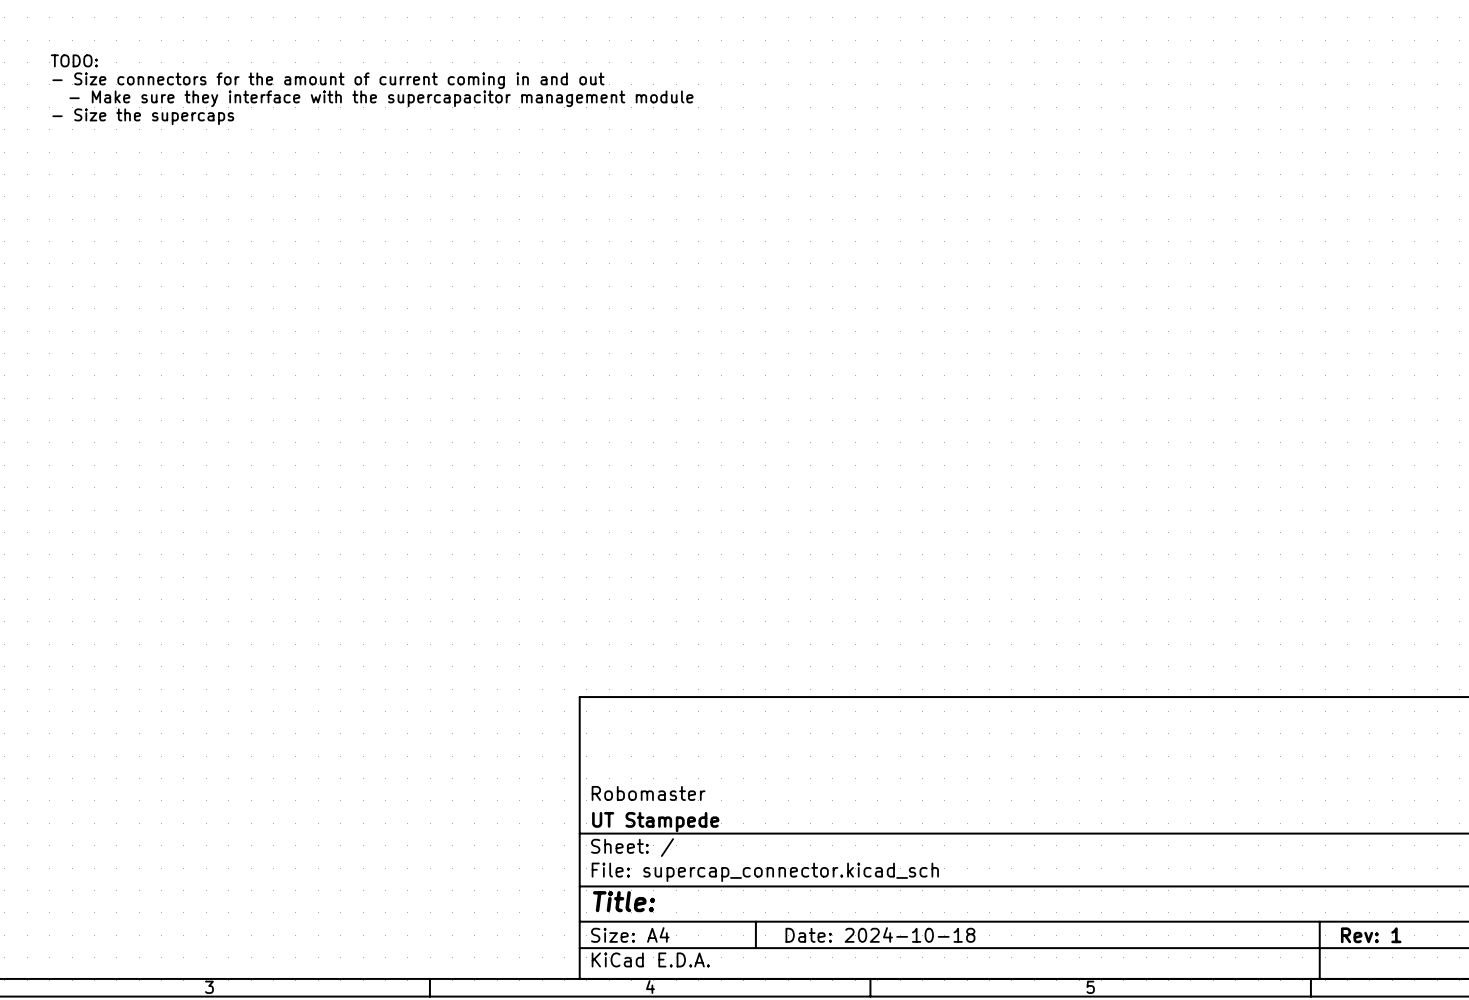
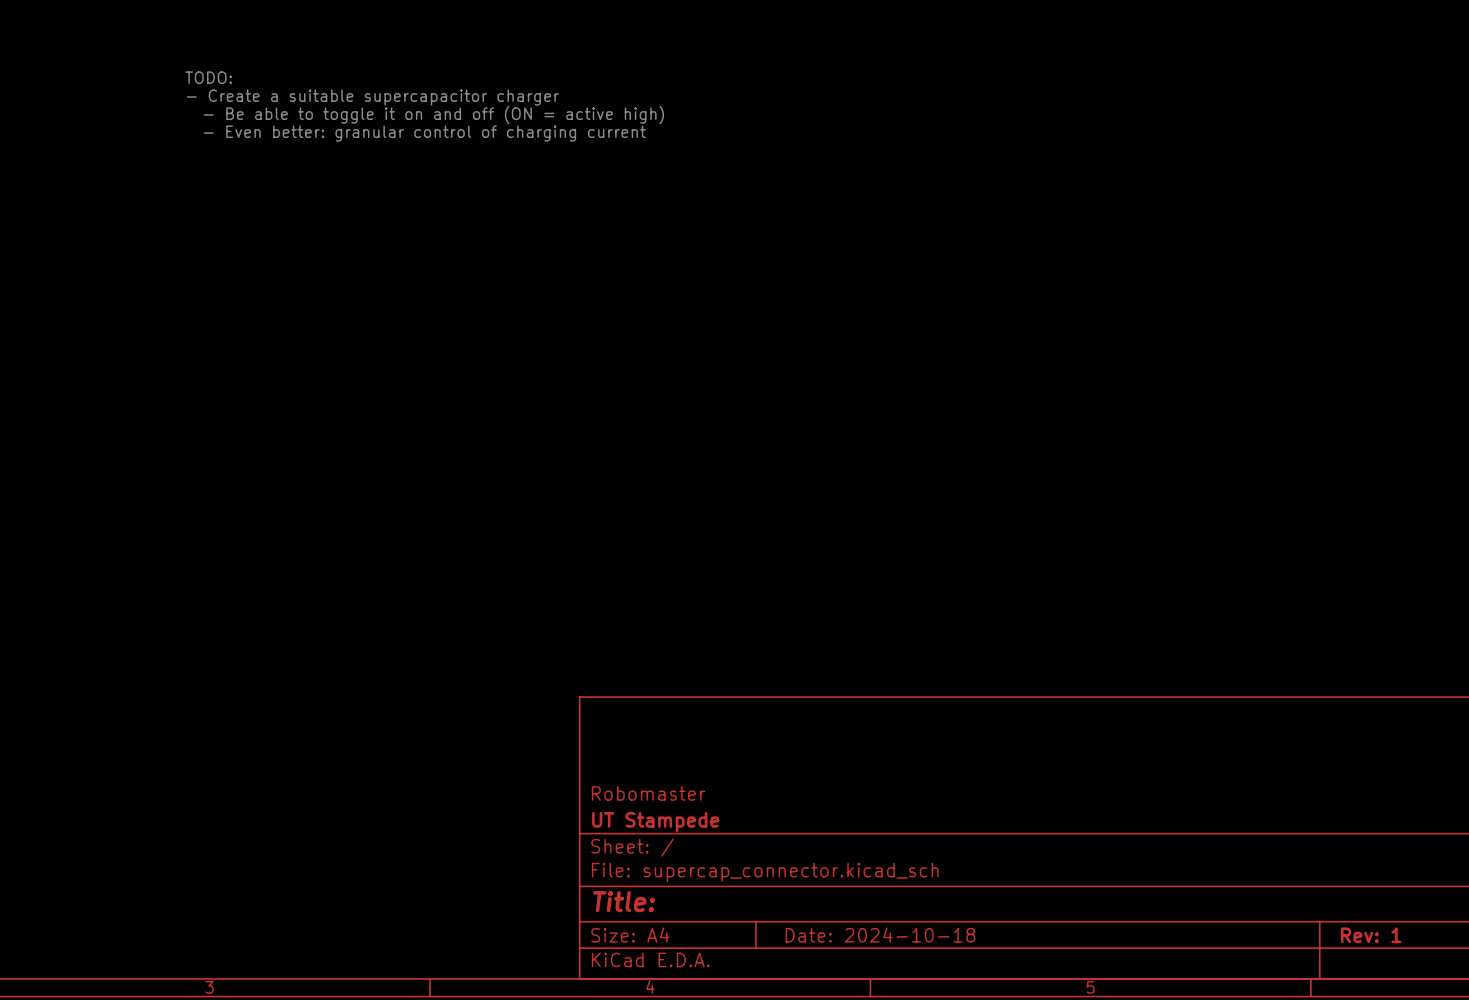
text position: TODO: (74, 60) -> TODO: (208, 77)
text: - Size connectors for the amount of current coming in and out (328, 80) -> none
text: none -> - Create a suitable supercapacitor charger (372, 97)
text: - Make sure they interface with the supercapacitor management module (381, 98) -> none
text: none -> - Be able to toggle it on and off (ON = active high) (433, 115)
text: - Size the supercaps (143, 116) -> none
text: none -> - Even better: granular control of charging current (424, 133)

